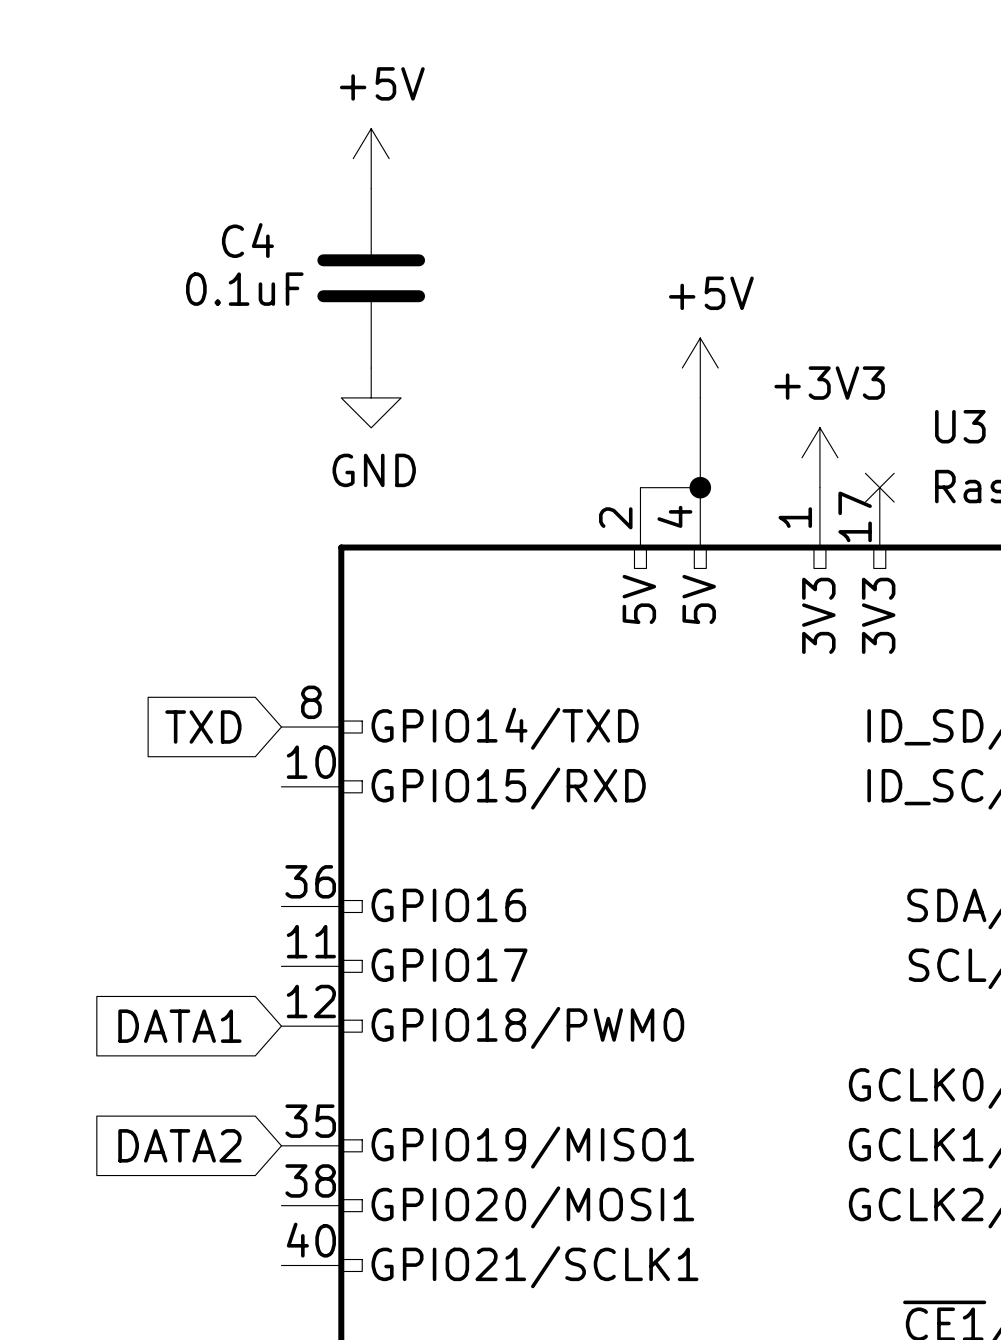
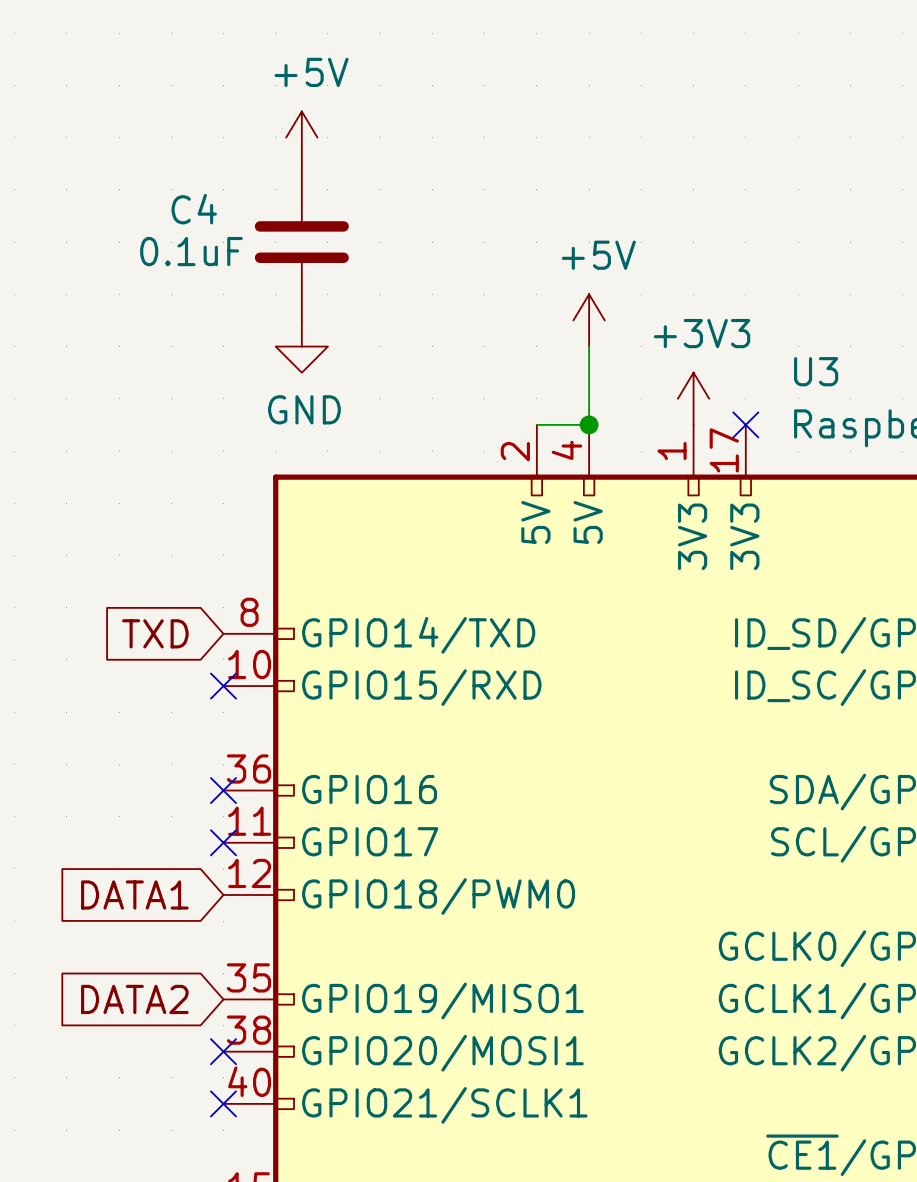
no-connect mark: none -> (223, 686)
no-connect mark: none -> (223, 790)
no-connect mark: none -> (223, 842)
no-connect mark: none -> (223, 1051)
no-connect mark: none -> (223, 1103)

